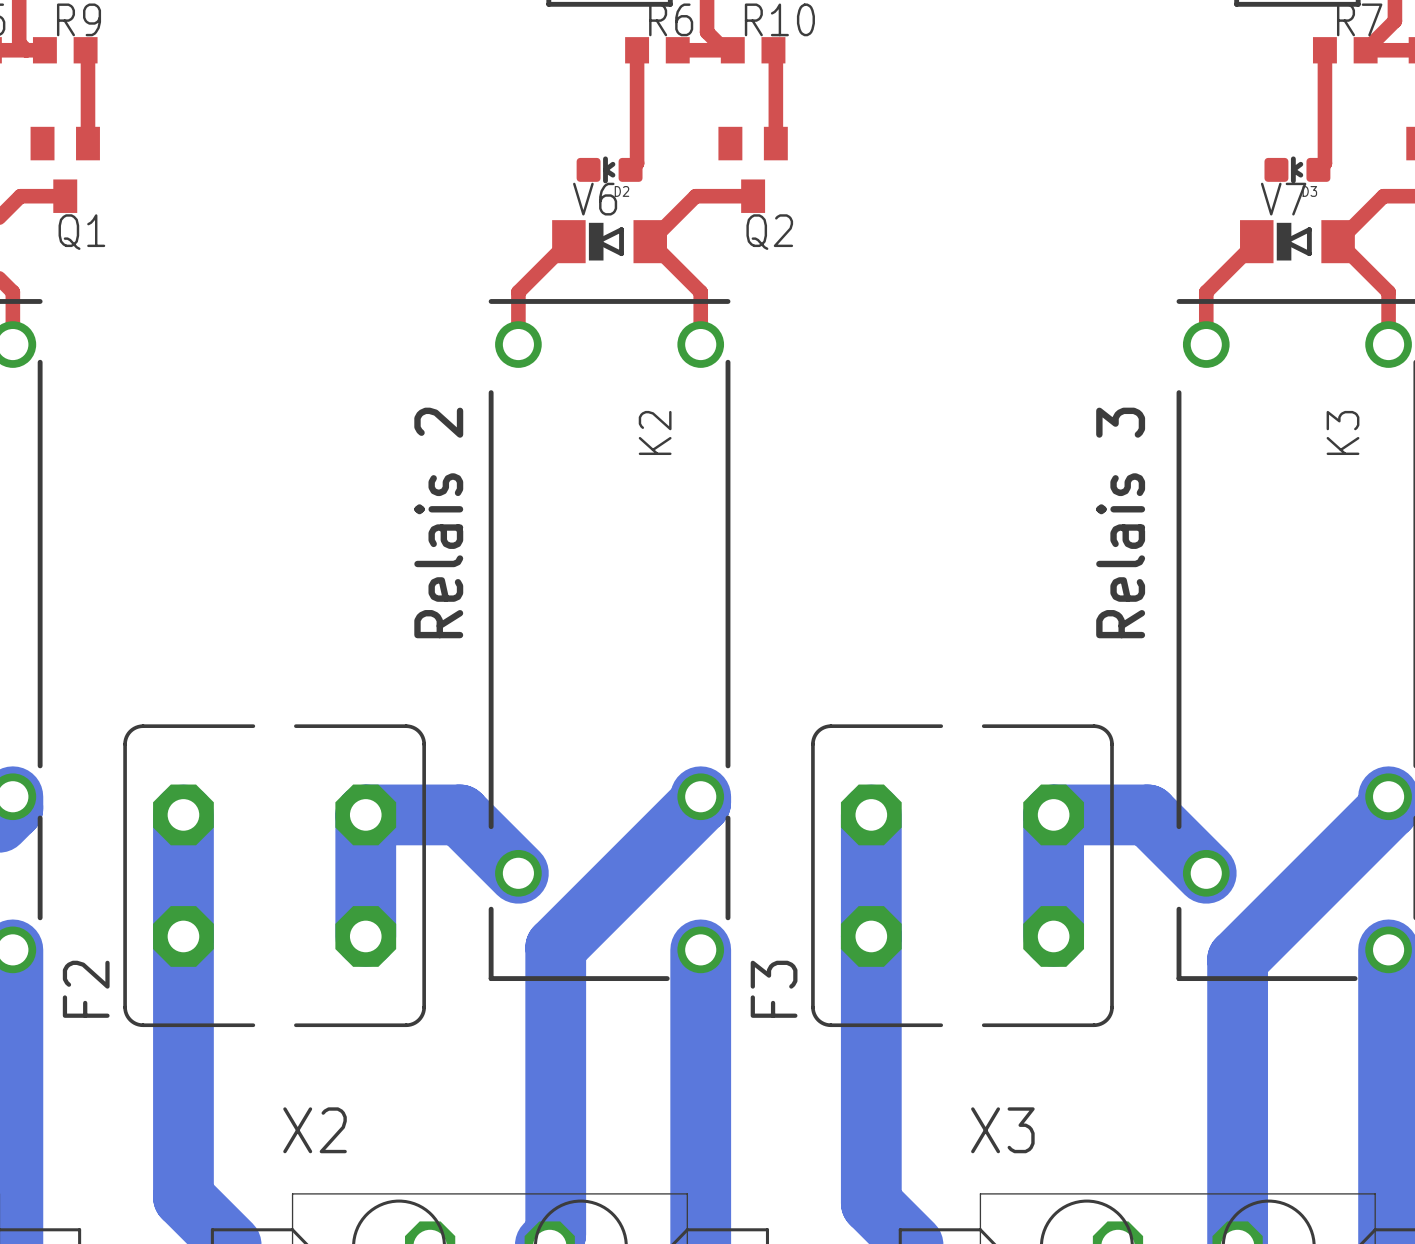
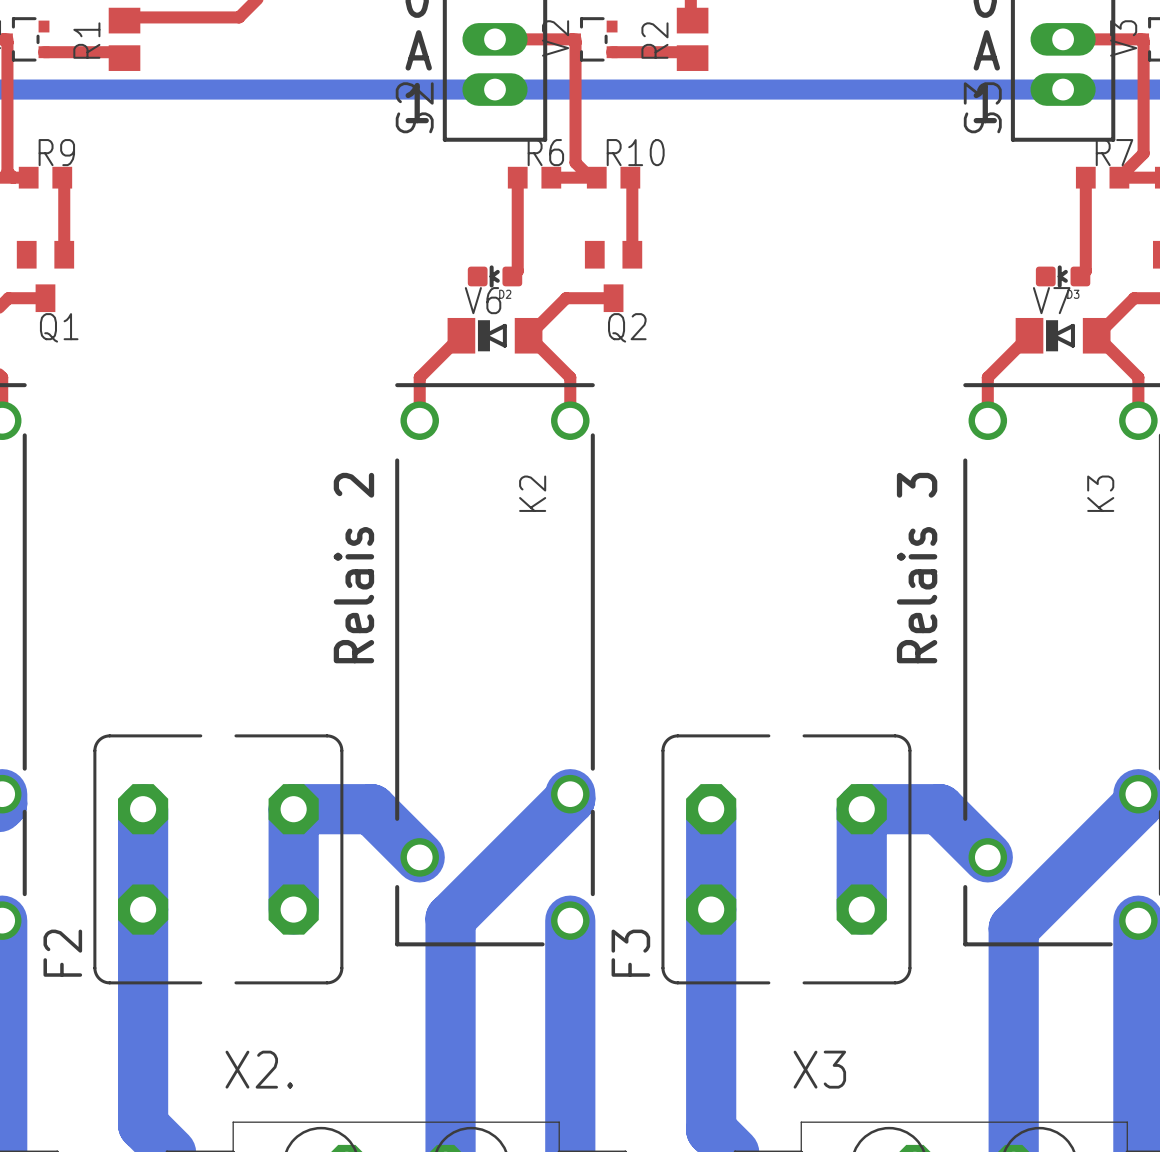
X2 name: X2 (315, 1130) -> X2. (259, 1069)

